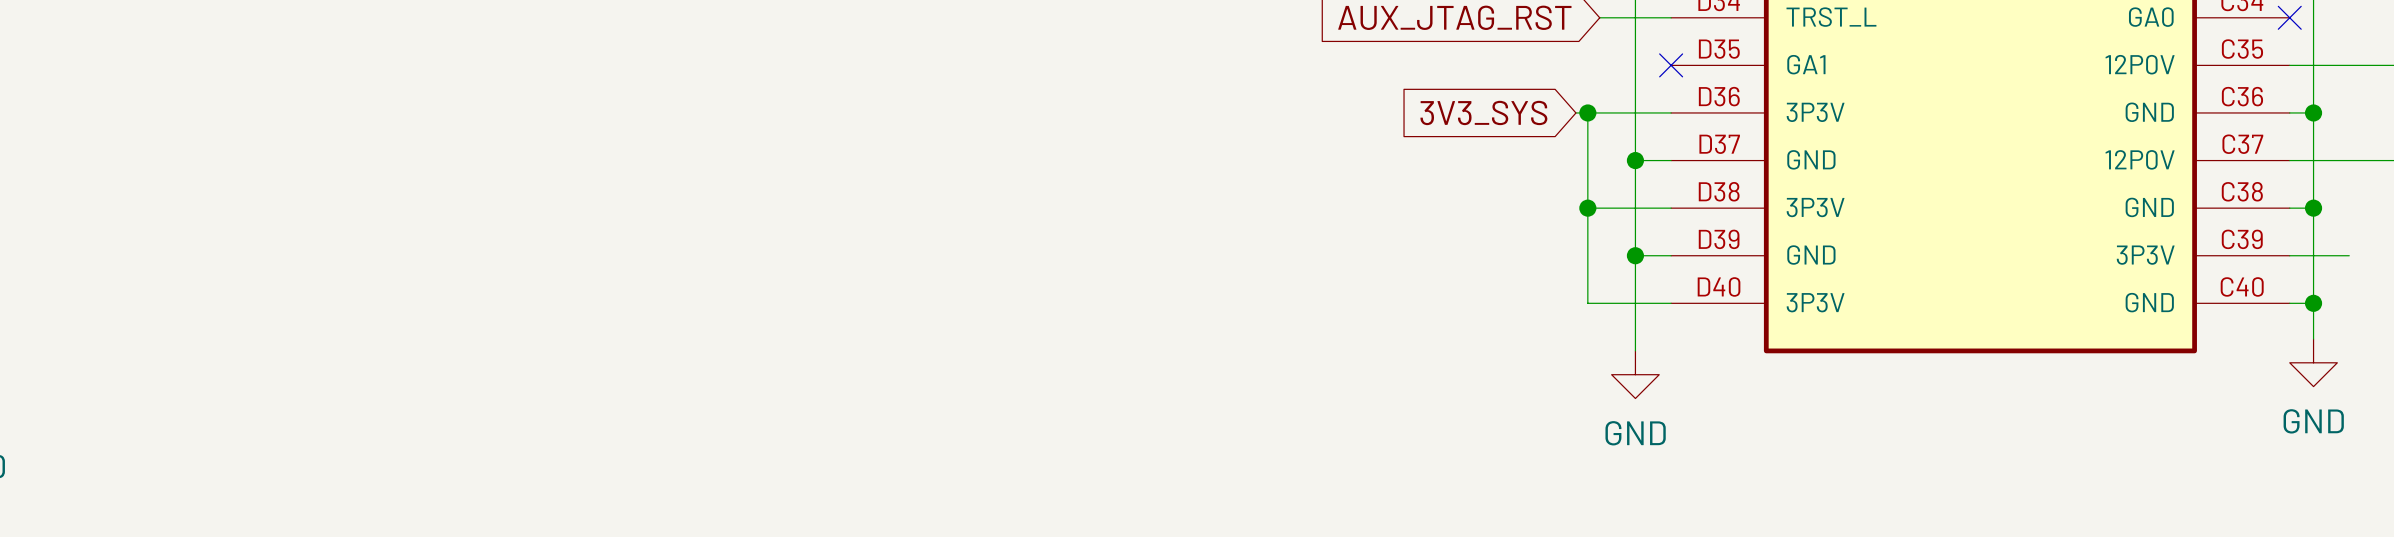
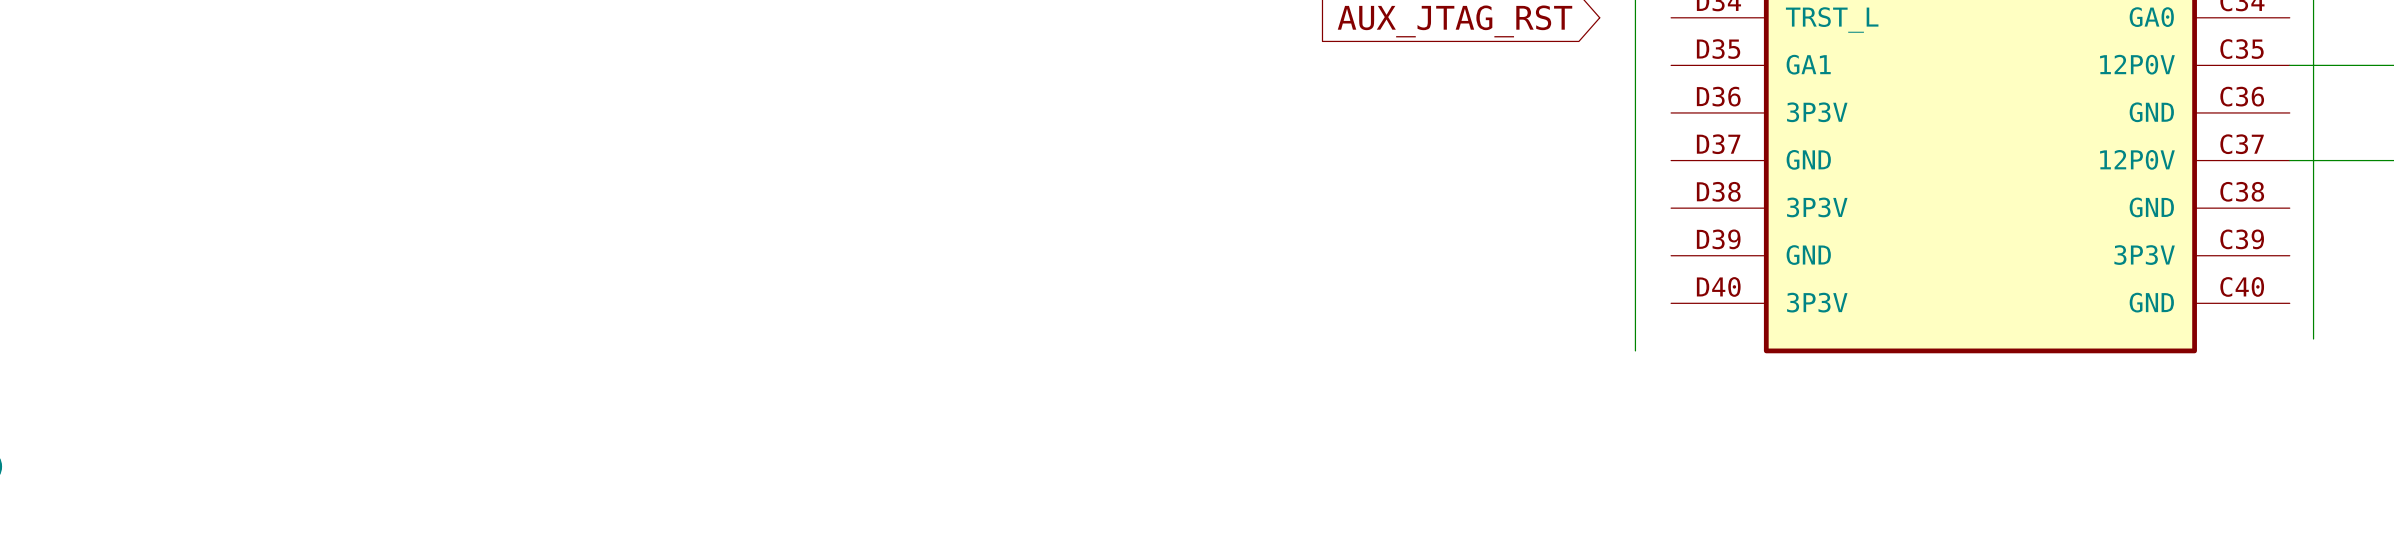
wire: (1599, 17) (1671, 17) -> none
no-connect mark: (2289, 17) -> none
no-connect mark: (1671, 65) -> none
global label: 3V3_SYS (1483, 112) -> none
wire: (1575, 112) (1671, 112) -> none
wire: (1587, 112) (1587, 303) (1671, 303) -> none
junction: (1587, 112) -> none
wire: (2289, 112) (2313, 112) -> none
junction: (2313, 112) -> none
wire: (1635, 160) (1671, 160) -> none
junction: (1635, 160) -> none
wire: (1587, 208) (1671, 208) -> none
junction: (1587, 208) -> none
wire: (2289, 208) (2313, 208) -> none
junction: (2313, 208) -> none
wire: (1635, 255) (1671, 255) -> none
junction: (1635, 255) -> none
wire: (2289, 255) (2349, 255) -> none
wire: (2289, 303) (2313, 303) -> none
junction: (2313, 303) -> none
power symbol: GND (2313, 362) -> none
power symbol: GND (1635, 374) -> none

